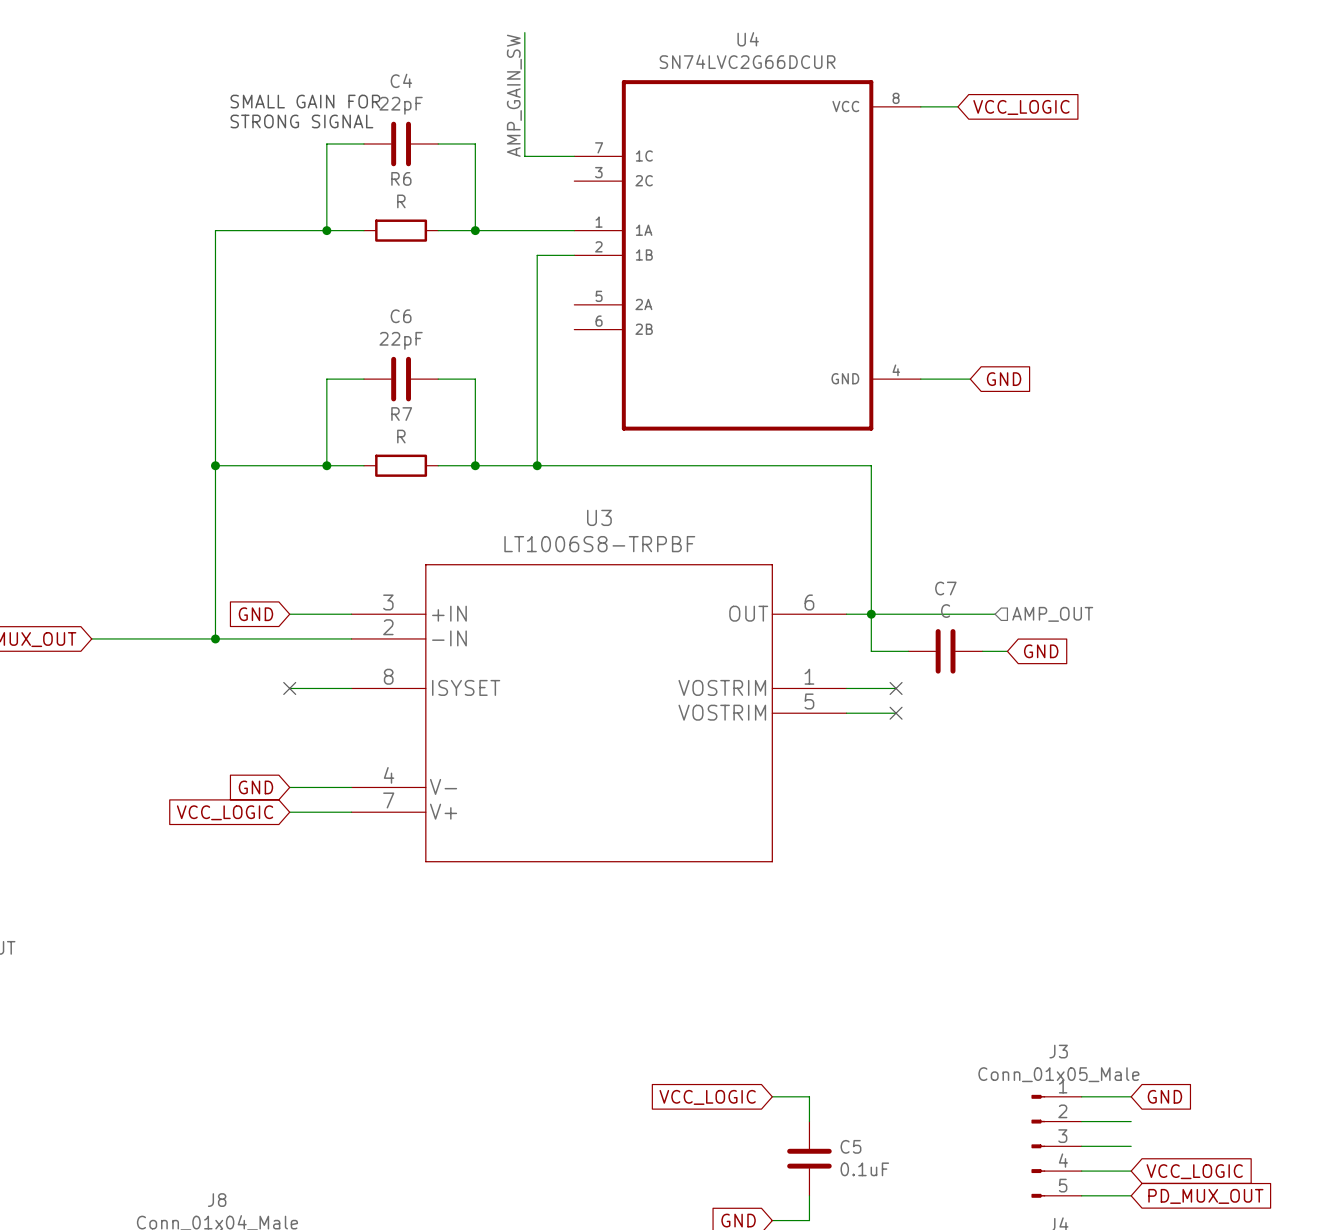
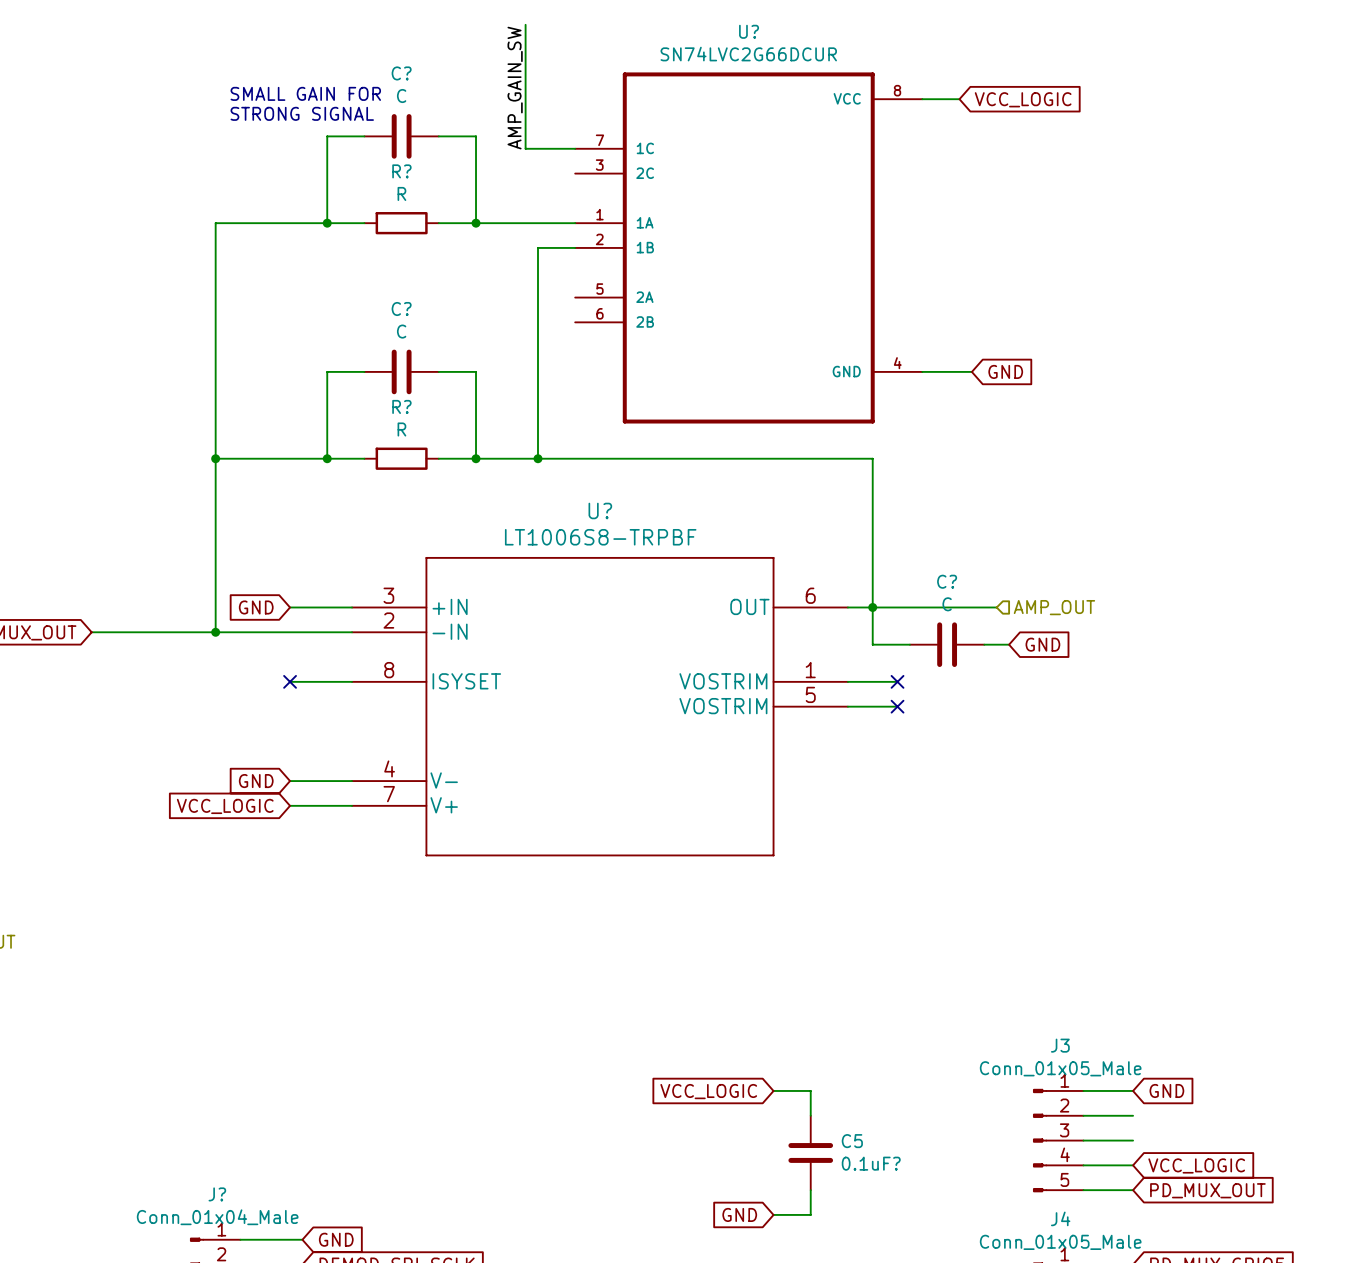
U4 name: U4 (748, 39) -> U? (749, 31)
C4 name: C4 (401, 80) -> C? (401, 73)
C4 value: 22pF (401, 105) -> C (401, 96)
R6 name: R6 (401, 178) -> R? (401, 171)
C6 name: C6 (401, 316) -> C? (401, 308)
C6 value: 22pF (401, 340) -> C (401, 331)
R7 name: R7 (401, 414) -> R? (401, 406)
U3 name: U3 (599, 517) -> U? (600, 510)
C7 name: C7 (945, 588) -> C? (947, 581)
C5 value: 0.1uF (864, 1169) -> 0.1uF? (871, 1163)
J8 name: J8 (217, 1200) -> J? (217, 1194)

